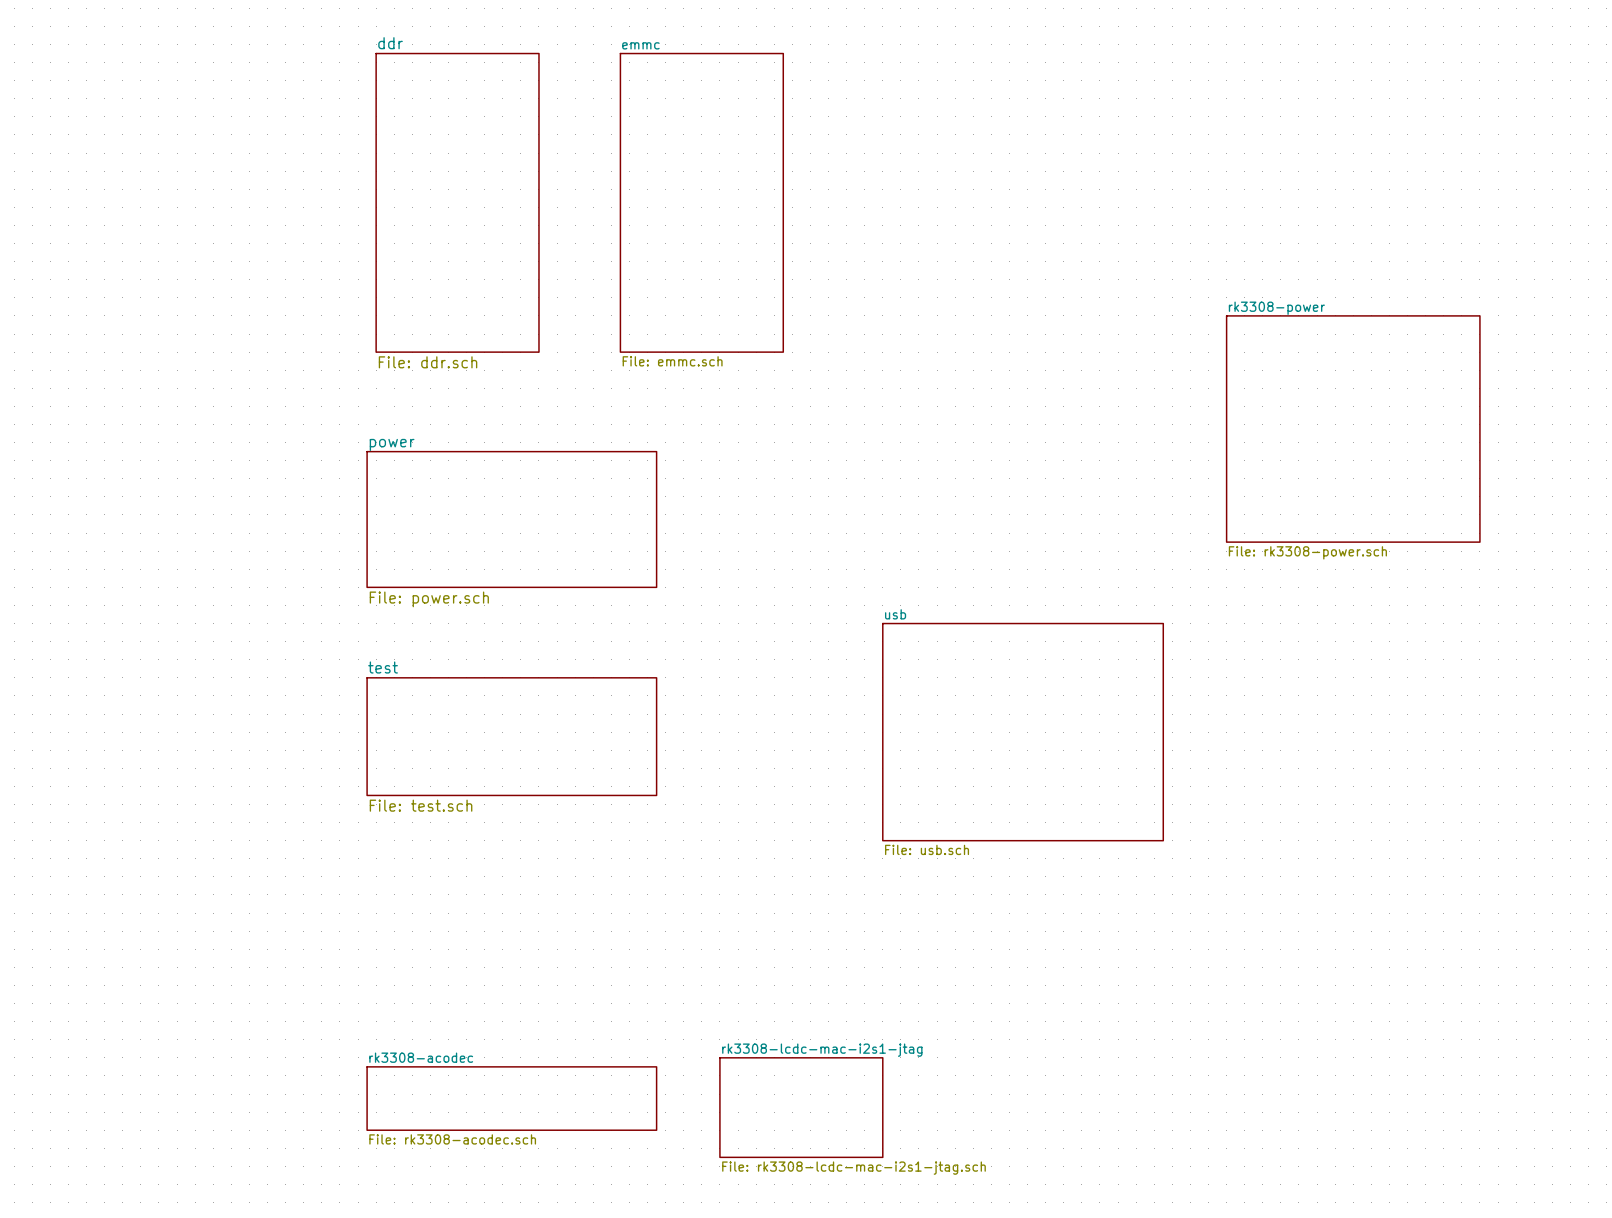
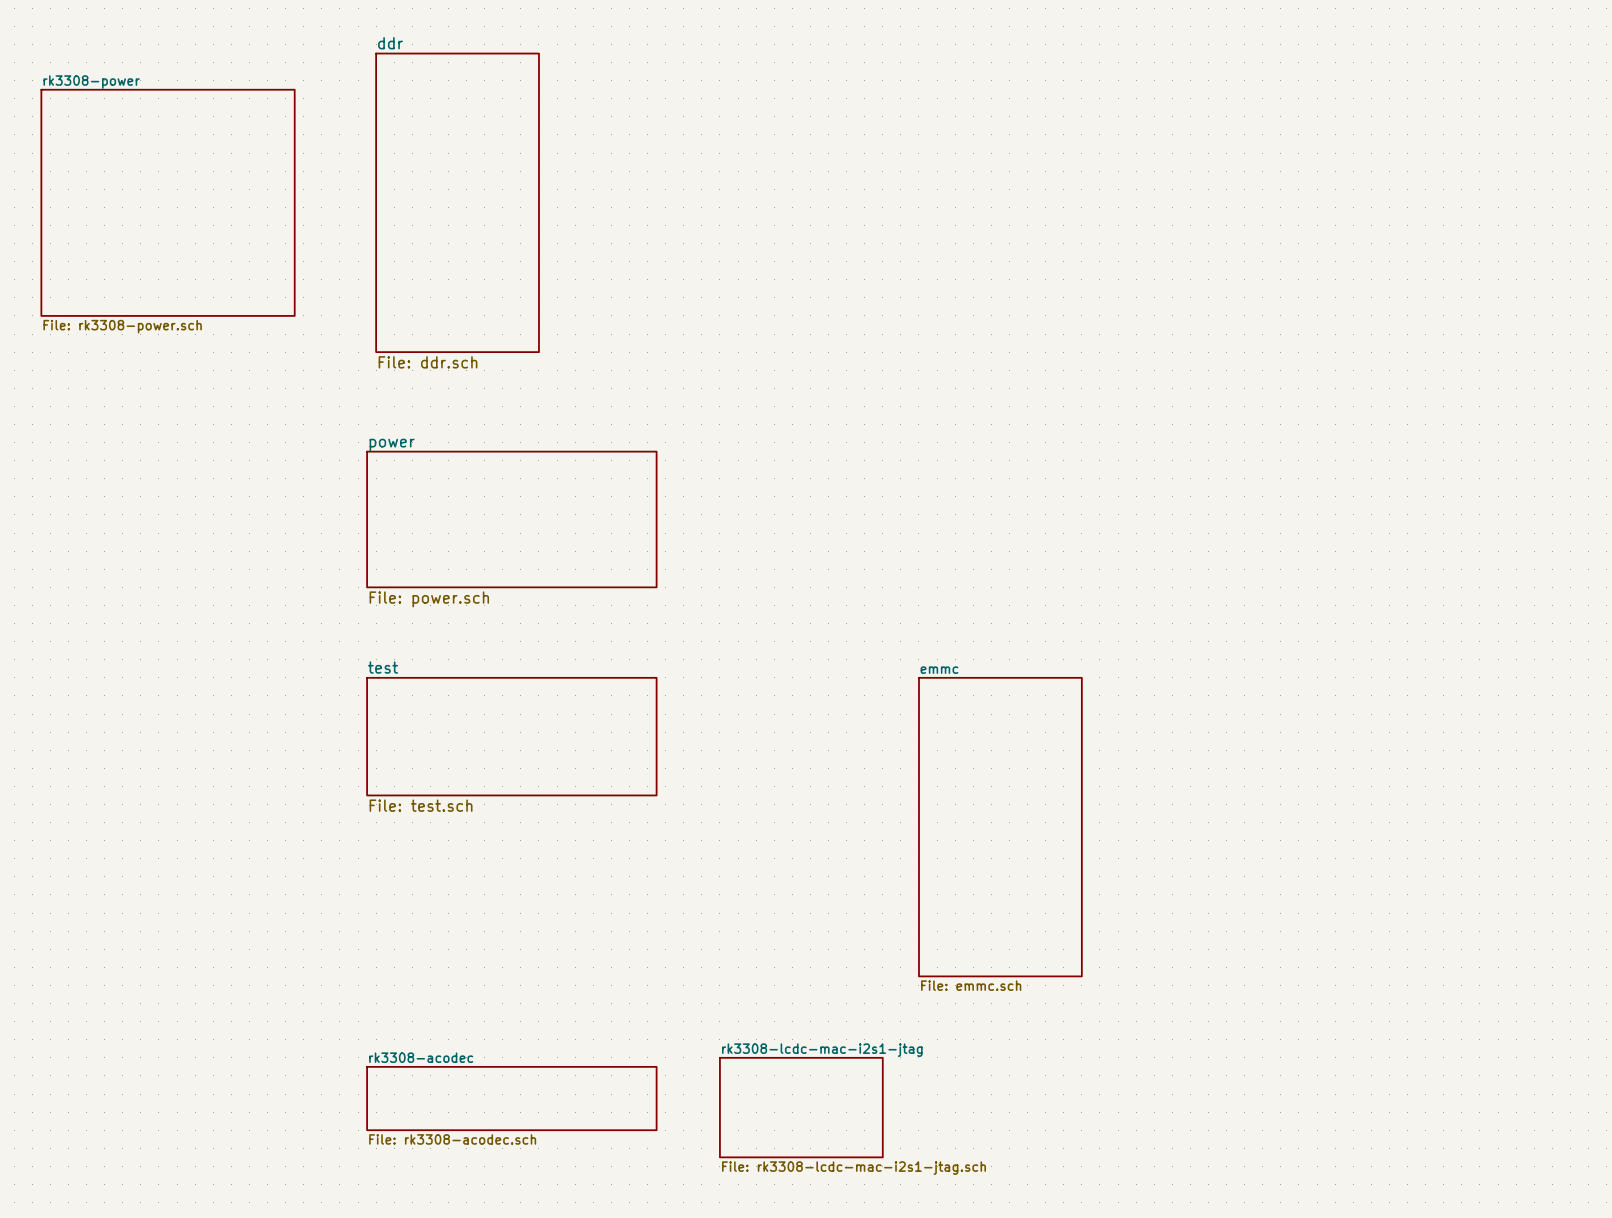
sheet emmc: File: emmc.sch (701, 202) -> none
sheet rk3308-power position: (1353, 429) -> (168, 202)
sheet usb: File: usb.sch (1023, 732) -> none
sheet emmc: none -> File: emmc.sch (1000, 827)

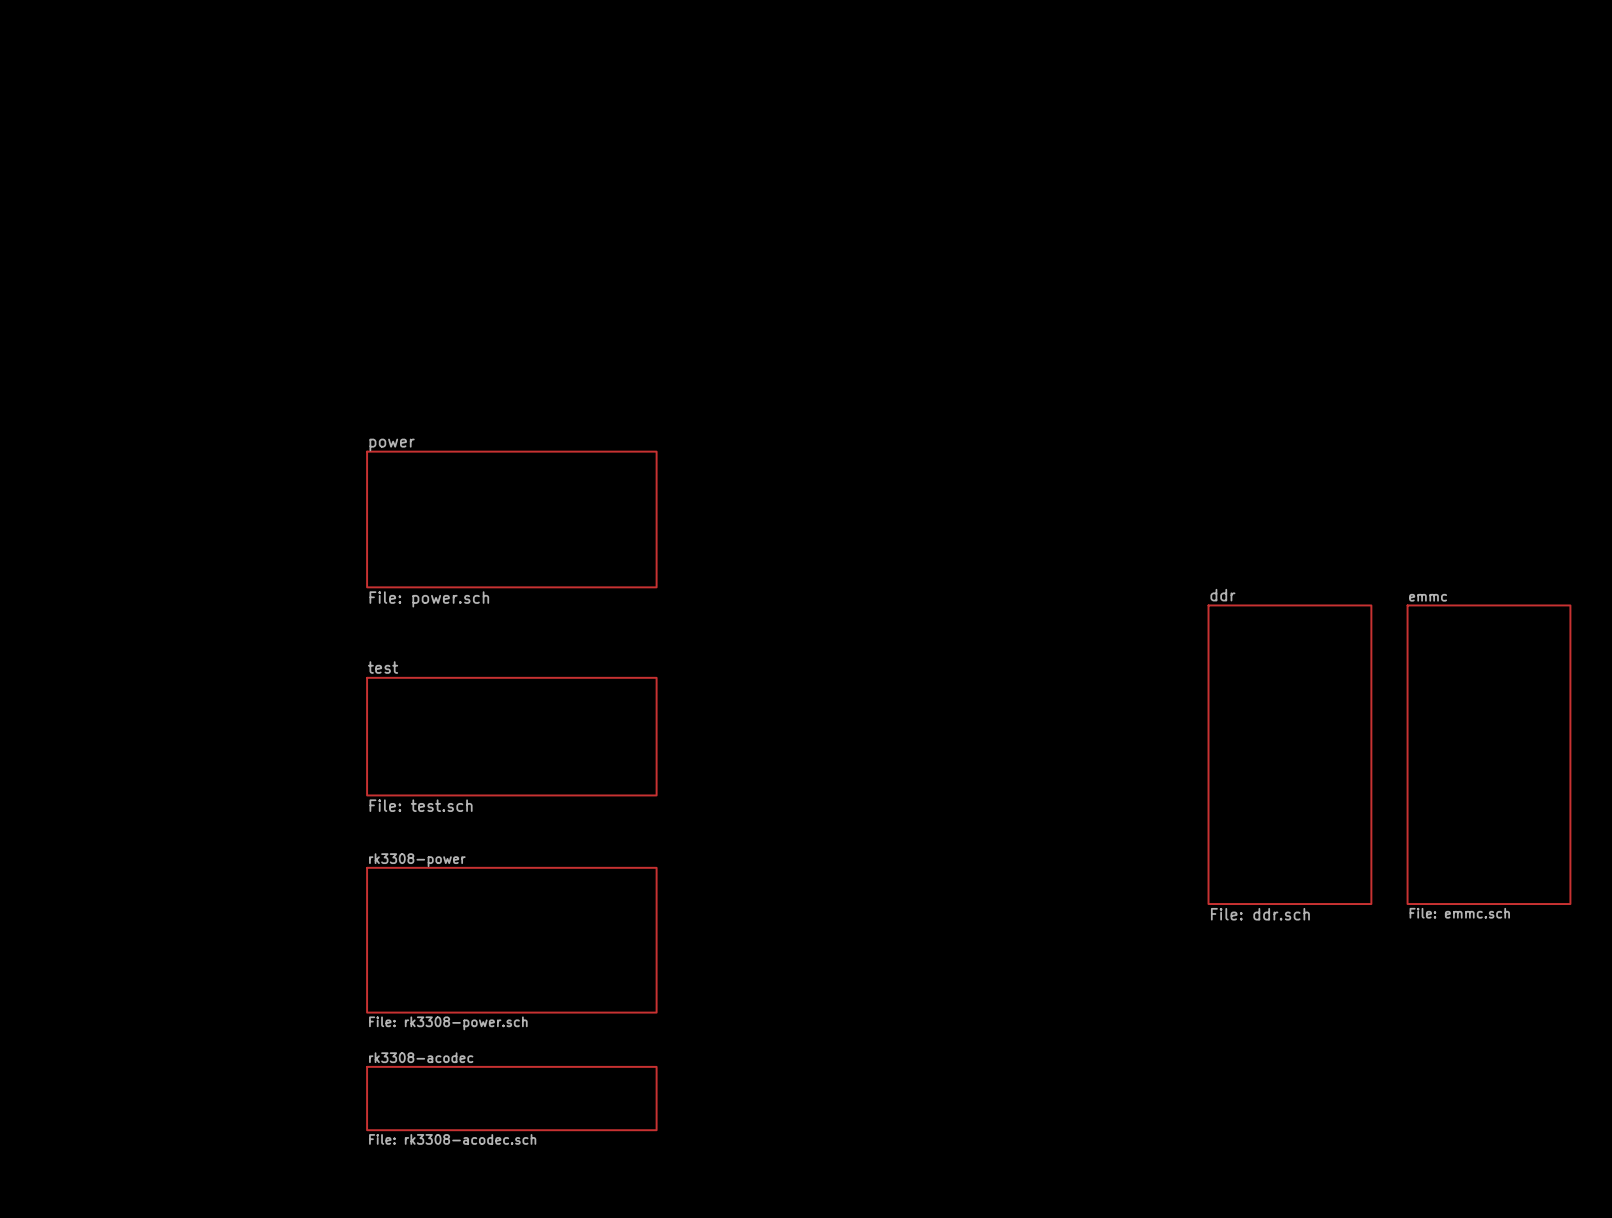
sheet rk3308-power name position: rk3308-power (91, 82) -> rk3308-power (417, 860)
sheet rk3308-power shape: [41, 89, 295, 316] -> [367, 867, 657, 1013]
sheet ddr: File: ddr.sch (457, 202) -> none
sheet rk3308-power value position: File: rk3308-power.sch (122, 326) -> File: rk3308-power.sch (448, 1023)
sheet ddr: none -> File: ddr.sch (1289, 754)
sheet emmc: none -> File: emmc.sch (1488, 754)
sheet emmc: File: emmc.sch (1000, 827) -> none
sheet rk3308-lcdc-mac-i2s1-jtag: File: rk3308-lcdc-mac-i2s1-jtag.sch (801, 1107) -> none

